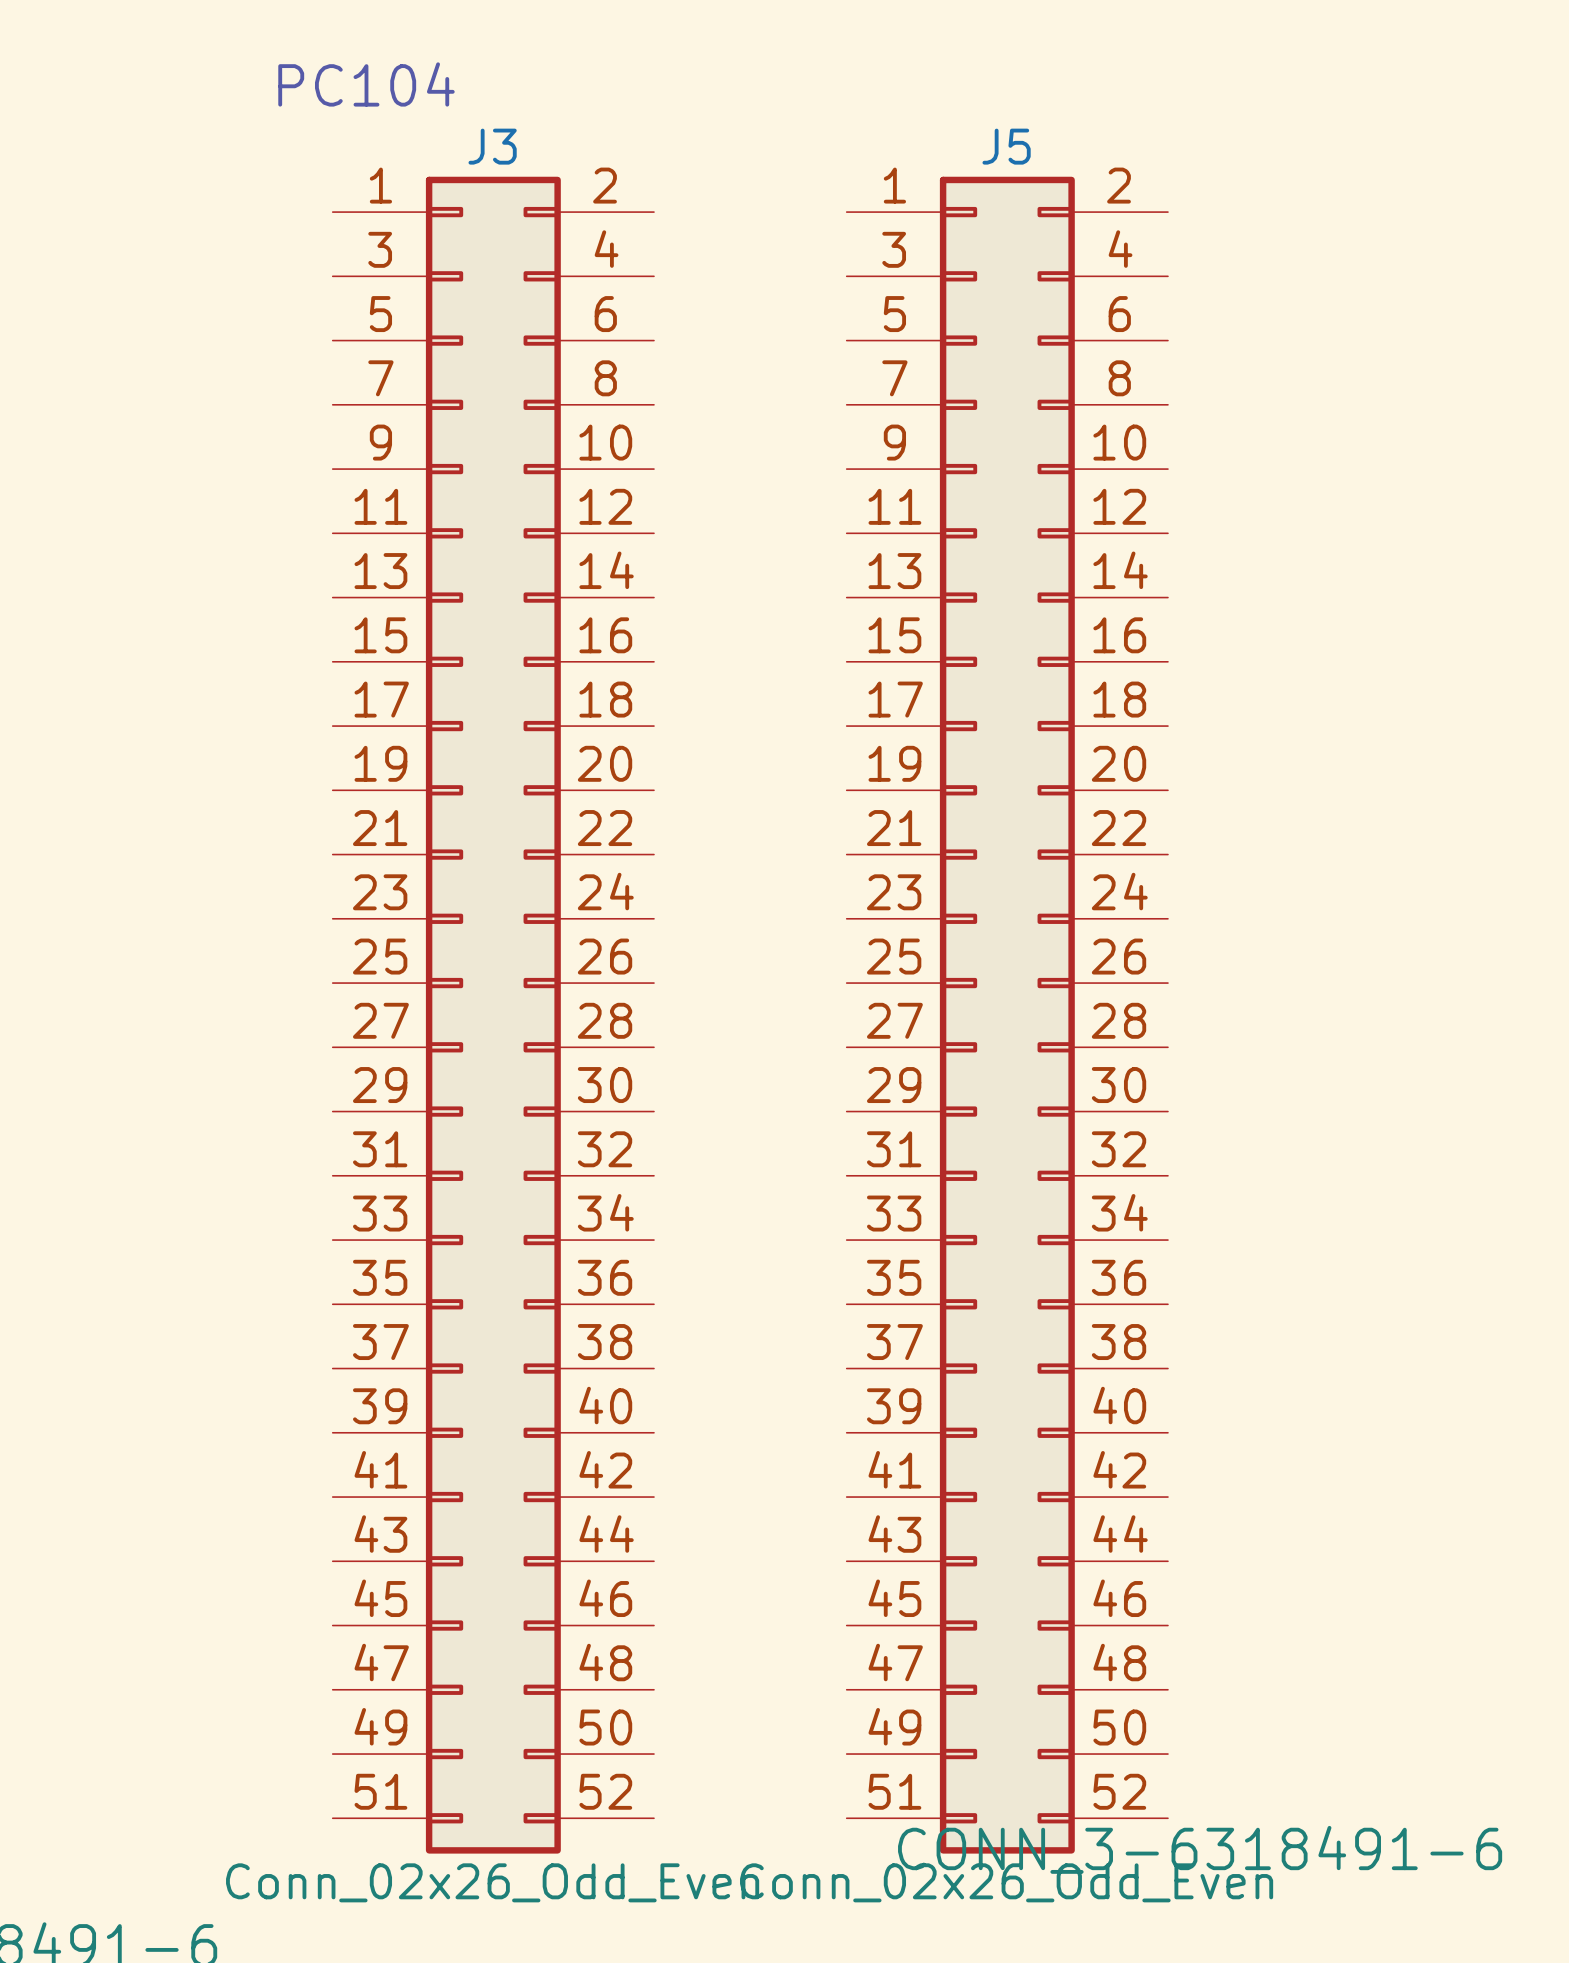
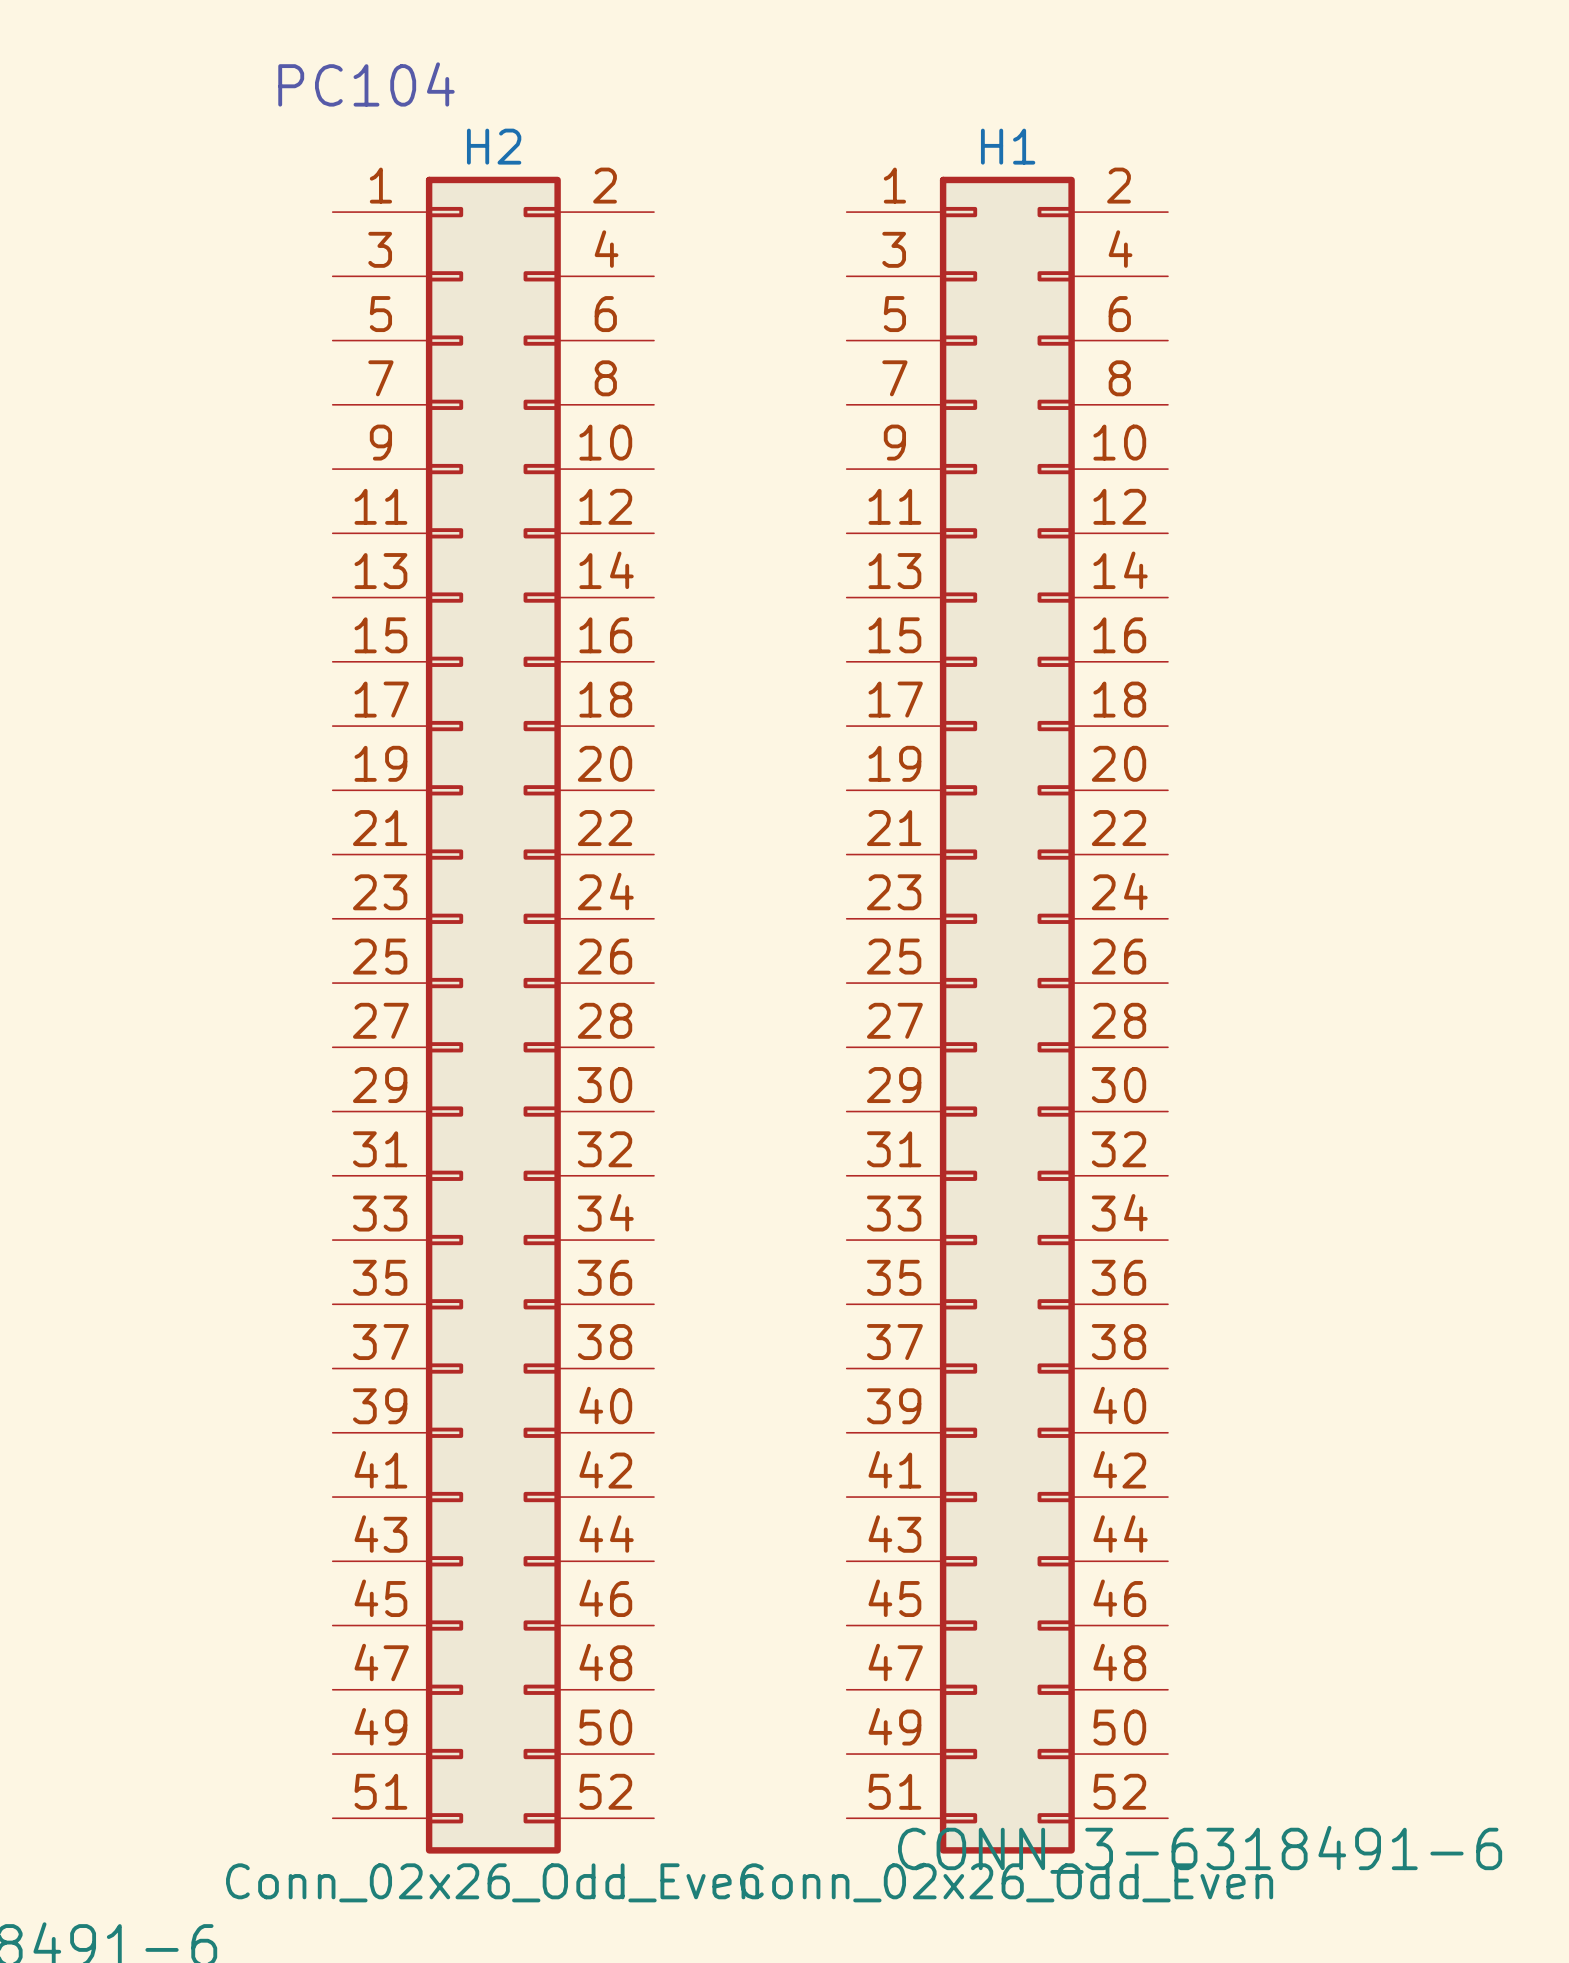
J3 name: J3 (492, 146) -> H2 (494, 146)
J5 name: J5 (1006, 146) -> H1 (1008, 146)

